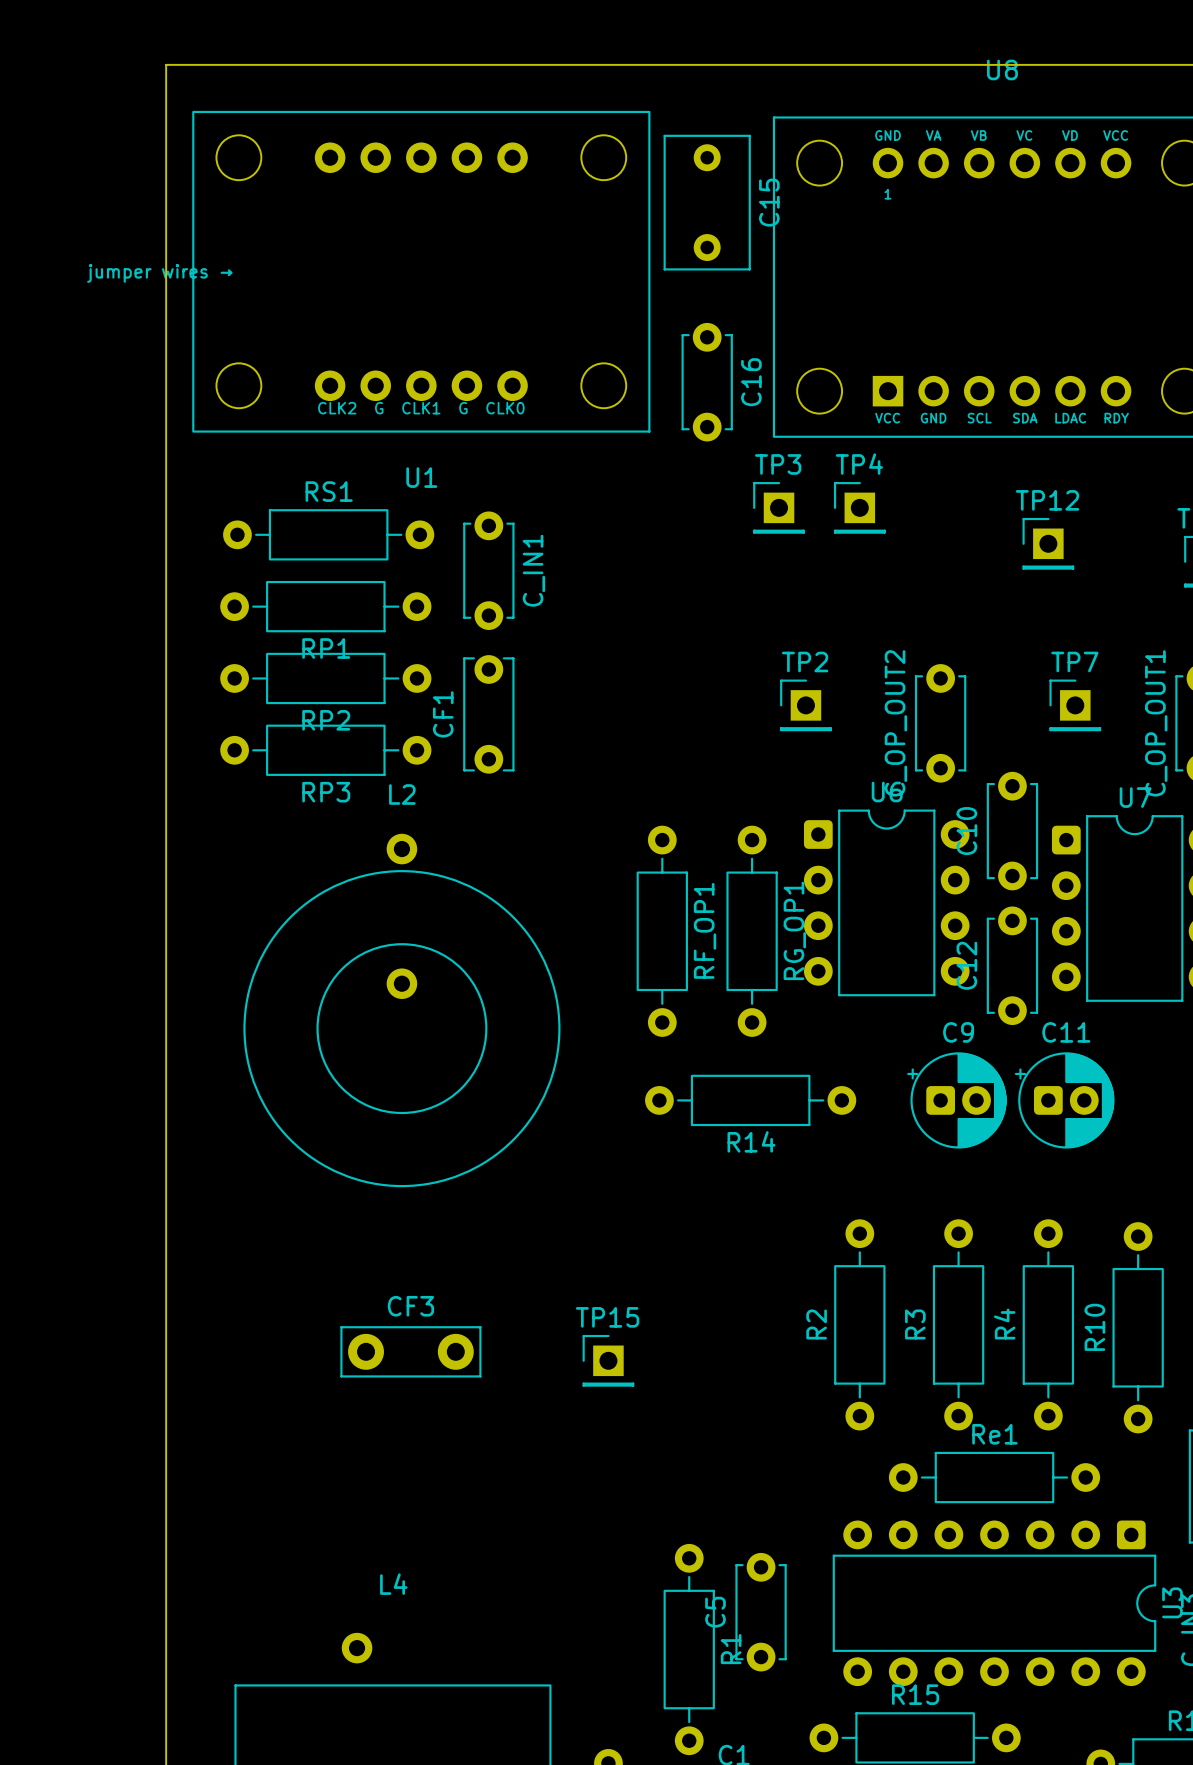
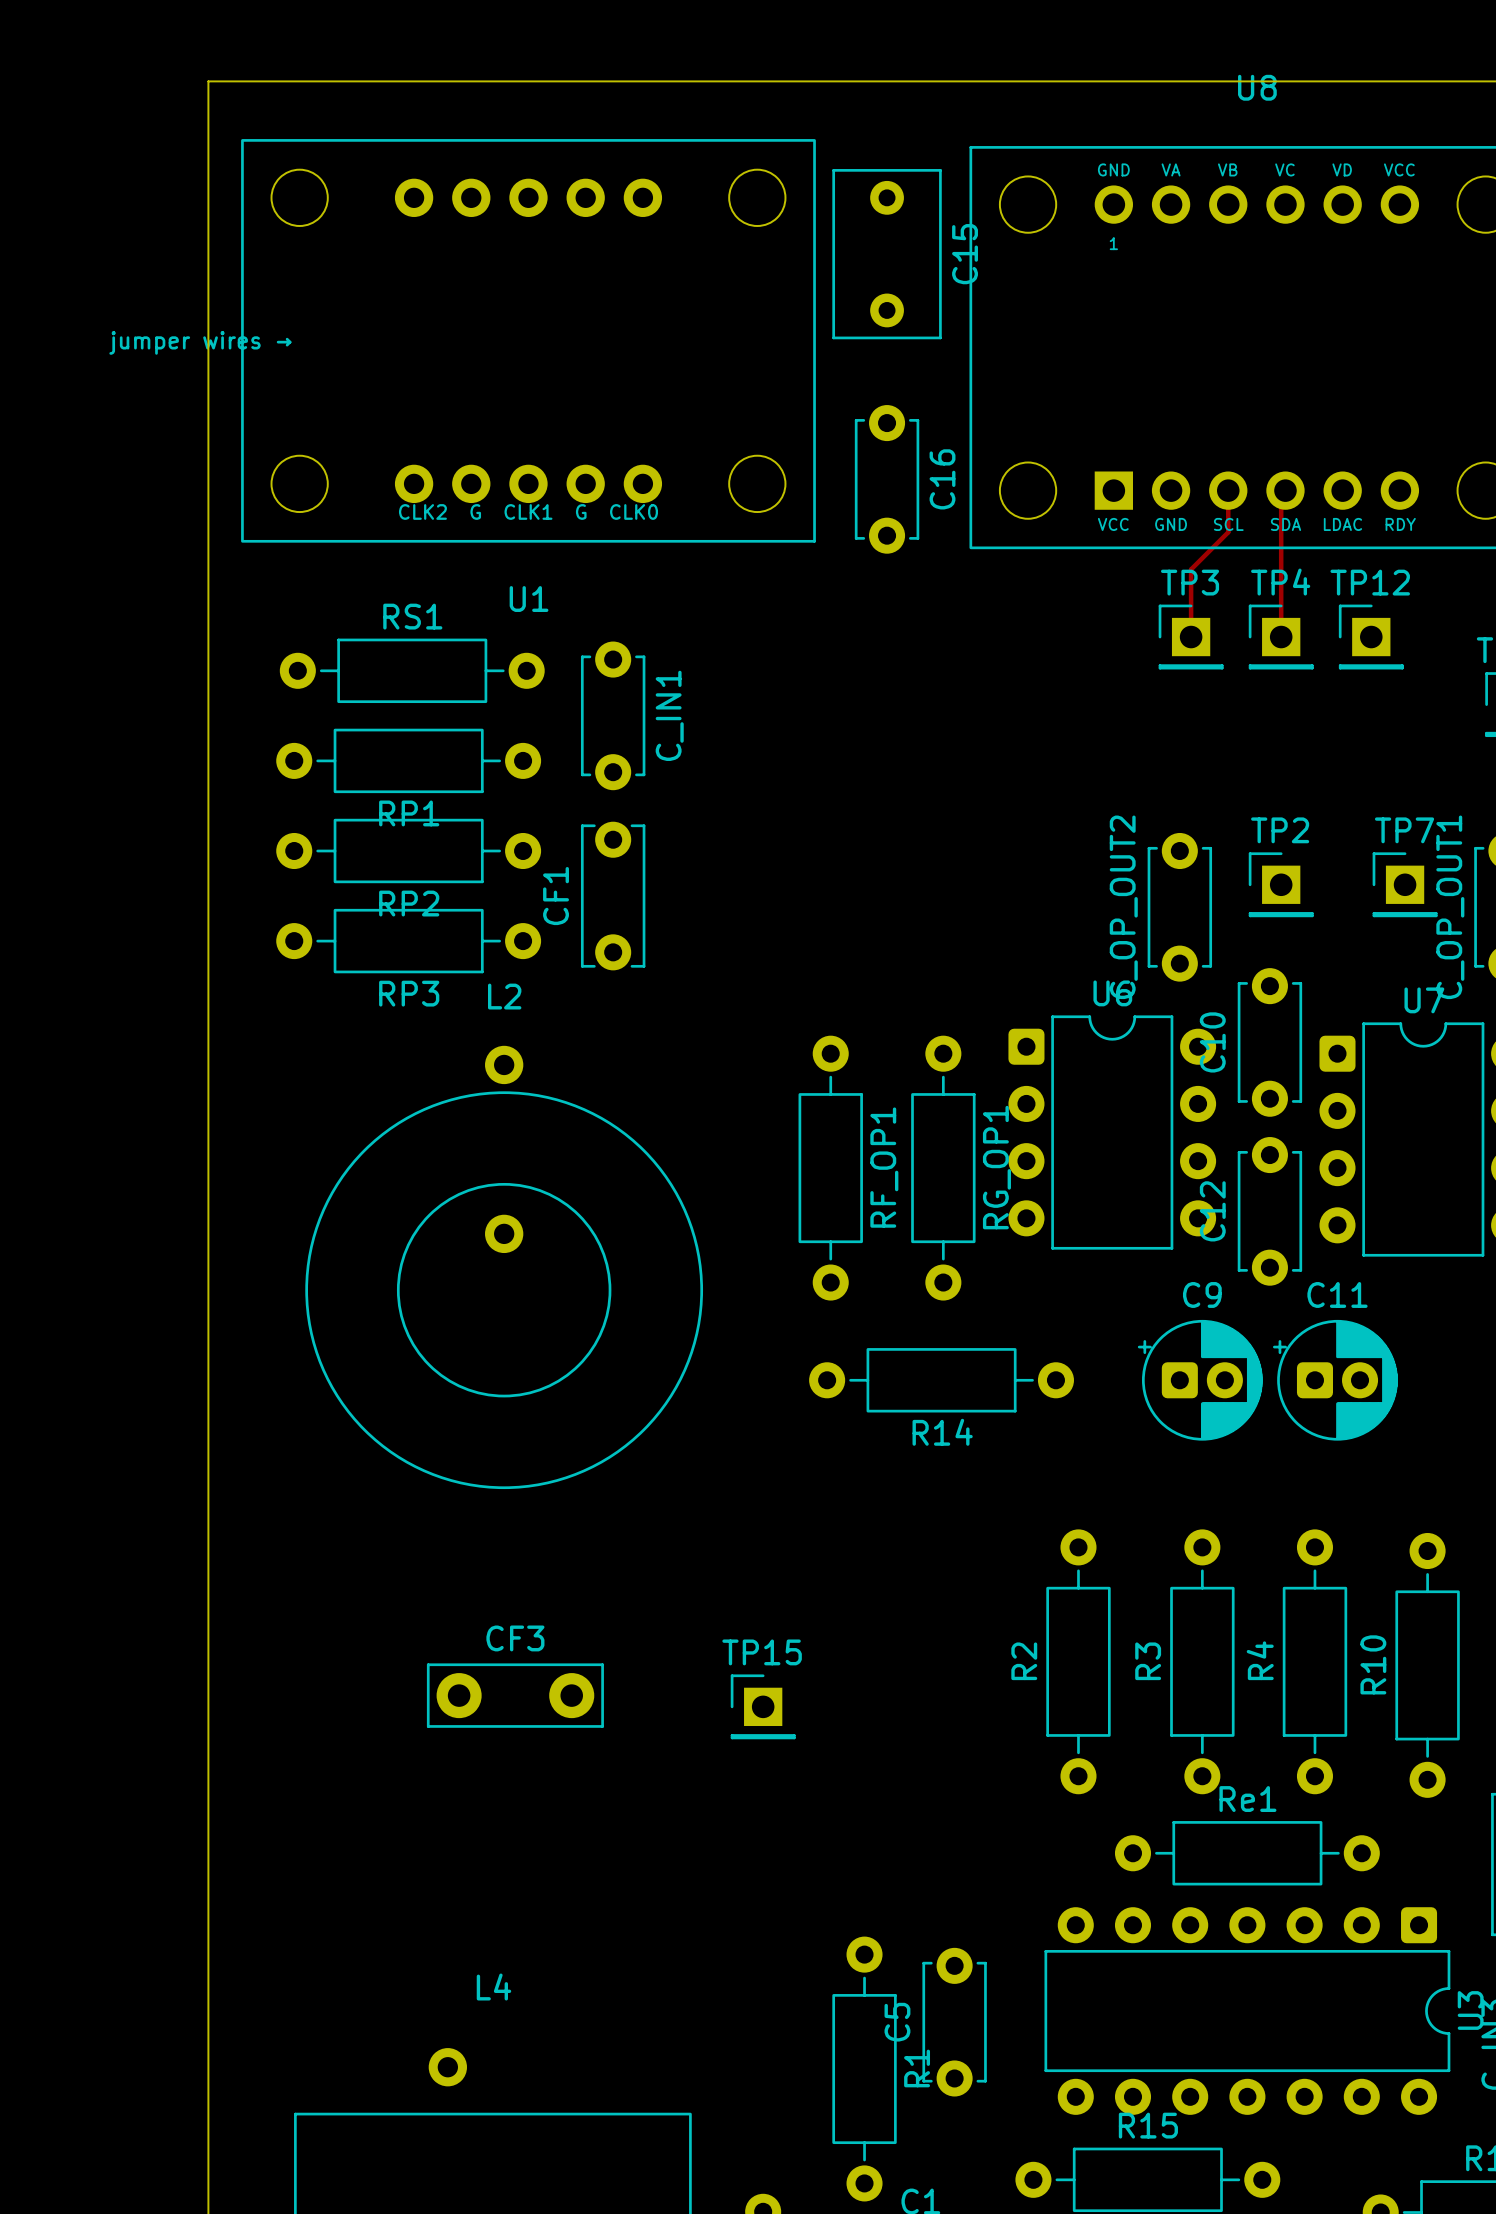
track: none -> (1228, 490) (1228, 532) (1191, 569) (1191, 637)
track: none -> (1285, 490) (1281, 494) (1281, 637)
TP3 position: (779, 507) -> (1191, 637)
TP4 position: (859, 507) -> (1281, 637)
TP12 position: (1048, 543) -> (1371, 637)
TP2 position: (805, 705) -> (1281, 884)
TP7 position: (1075, 705) -> (1405, 884)

